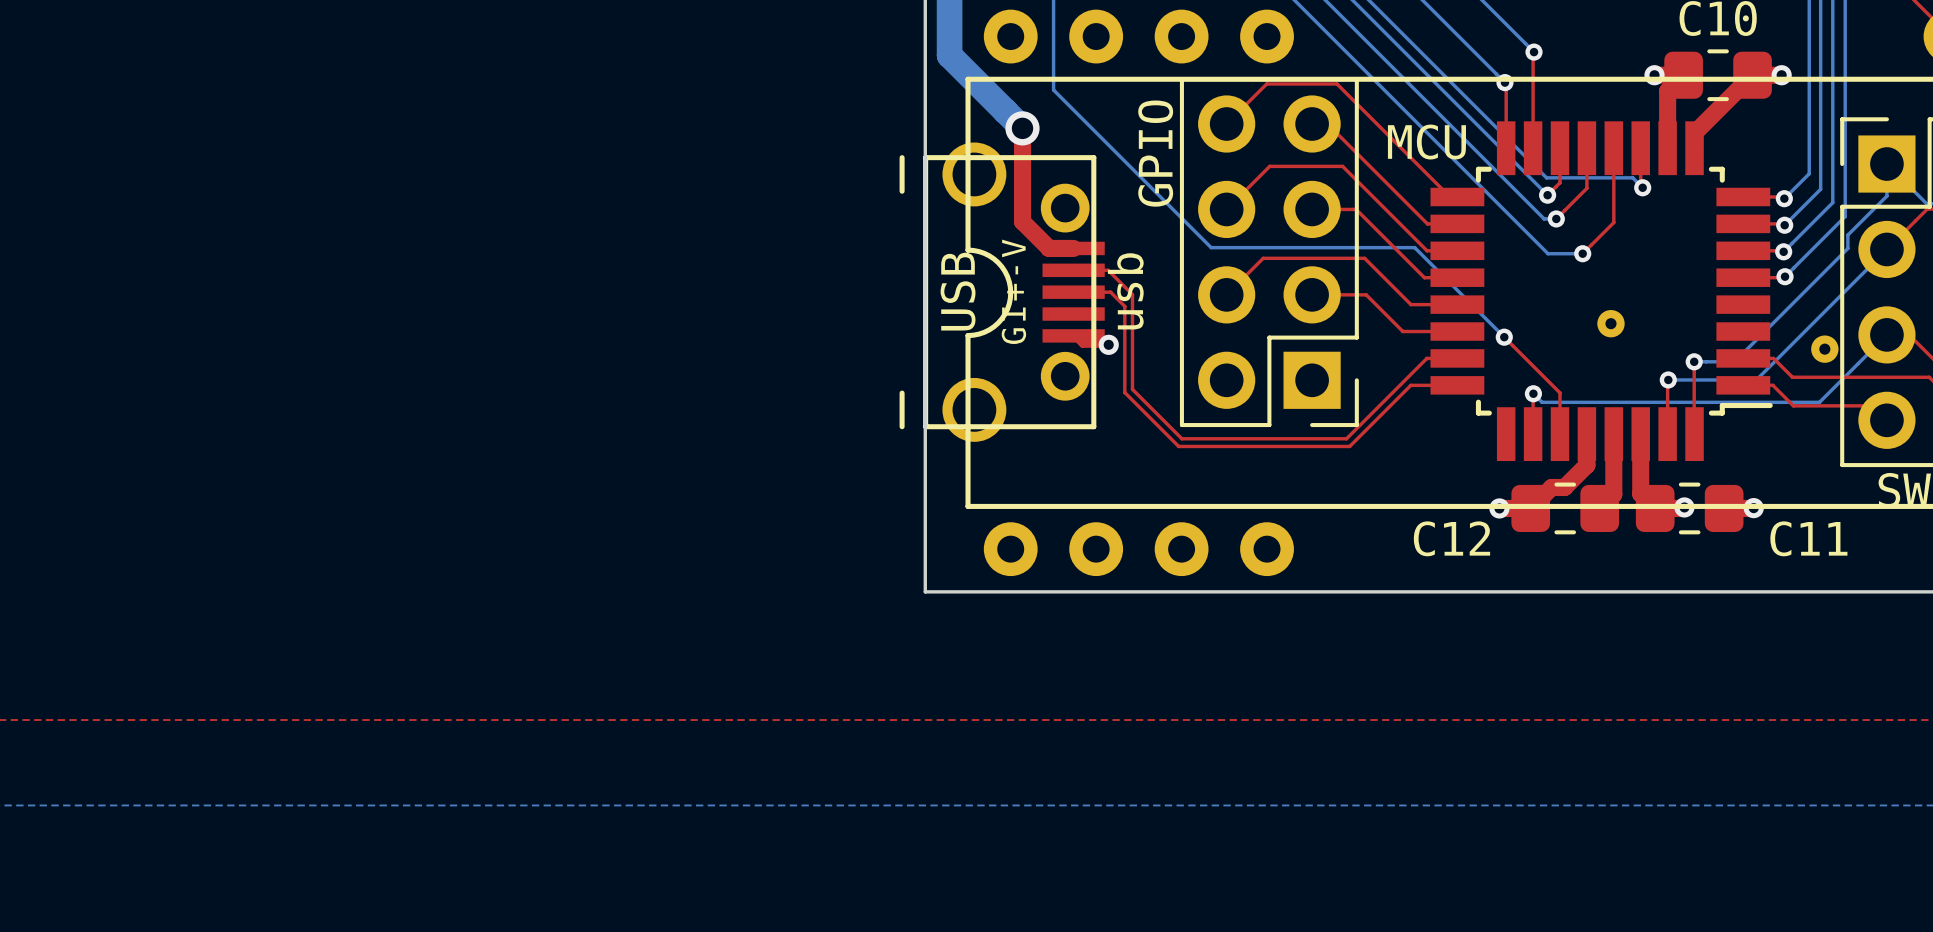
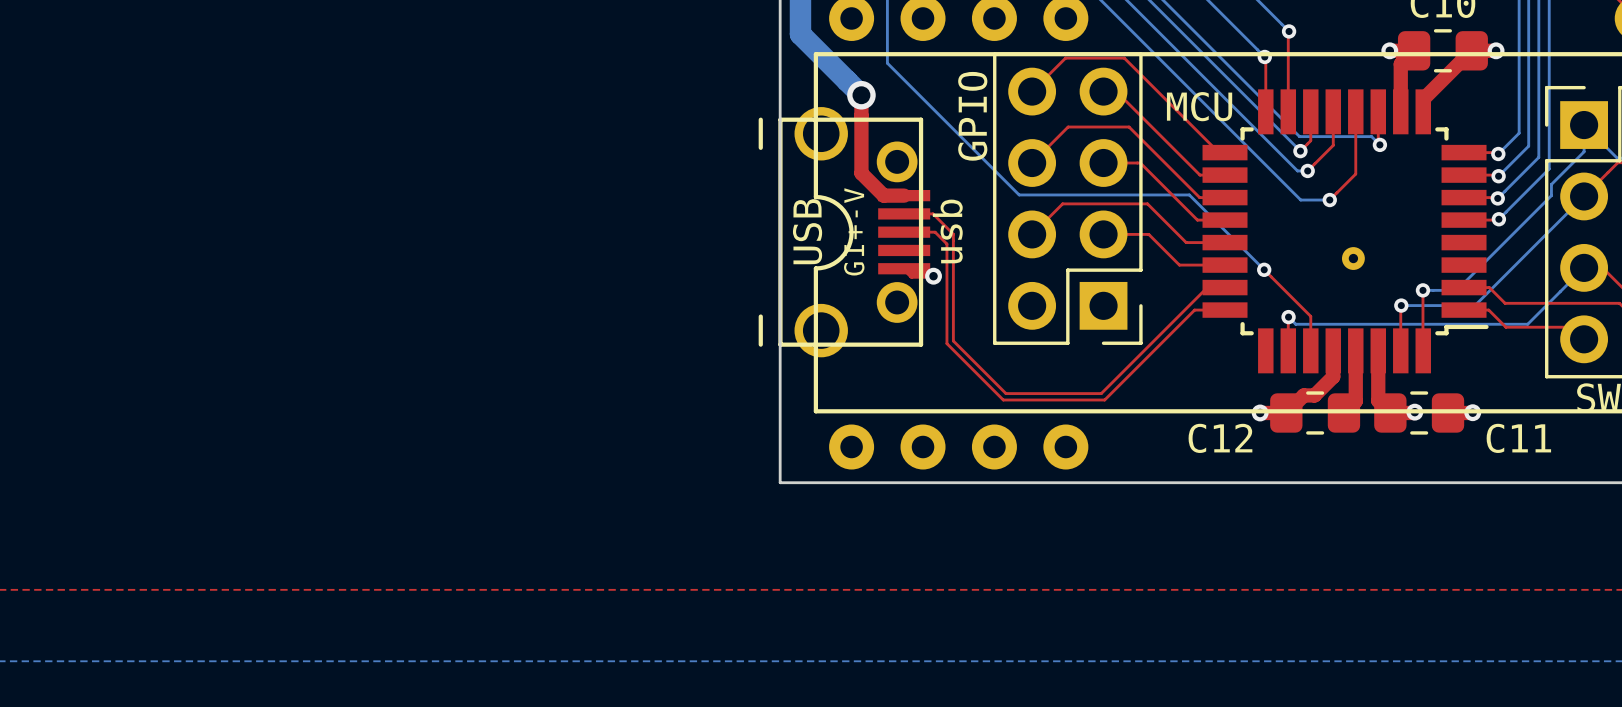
part: (1824, 349) -> none
top track: (1436, 358) (1426, 358) (1346, 438) (1181, 438) (1132, 389) -> (1207, 287) (1101, 393) (1005, 393) (953, 341) (953, 313)
top track: (1421, 385) (1410, 385) (1349, 446) (1178, 446) (1124, 392) -> (1194, 310) (1104, 400) (1003, 400) (946, 343) (946, 316)

